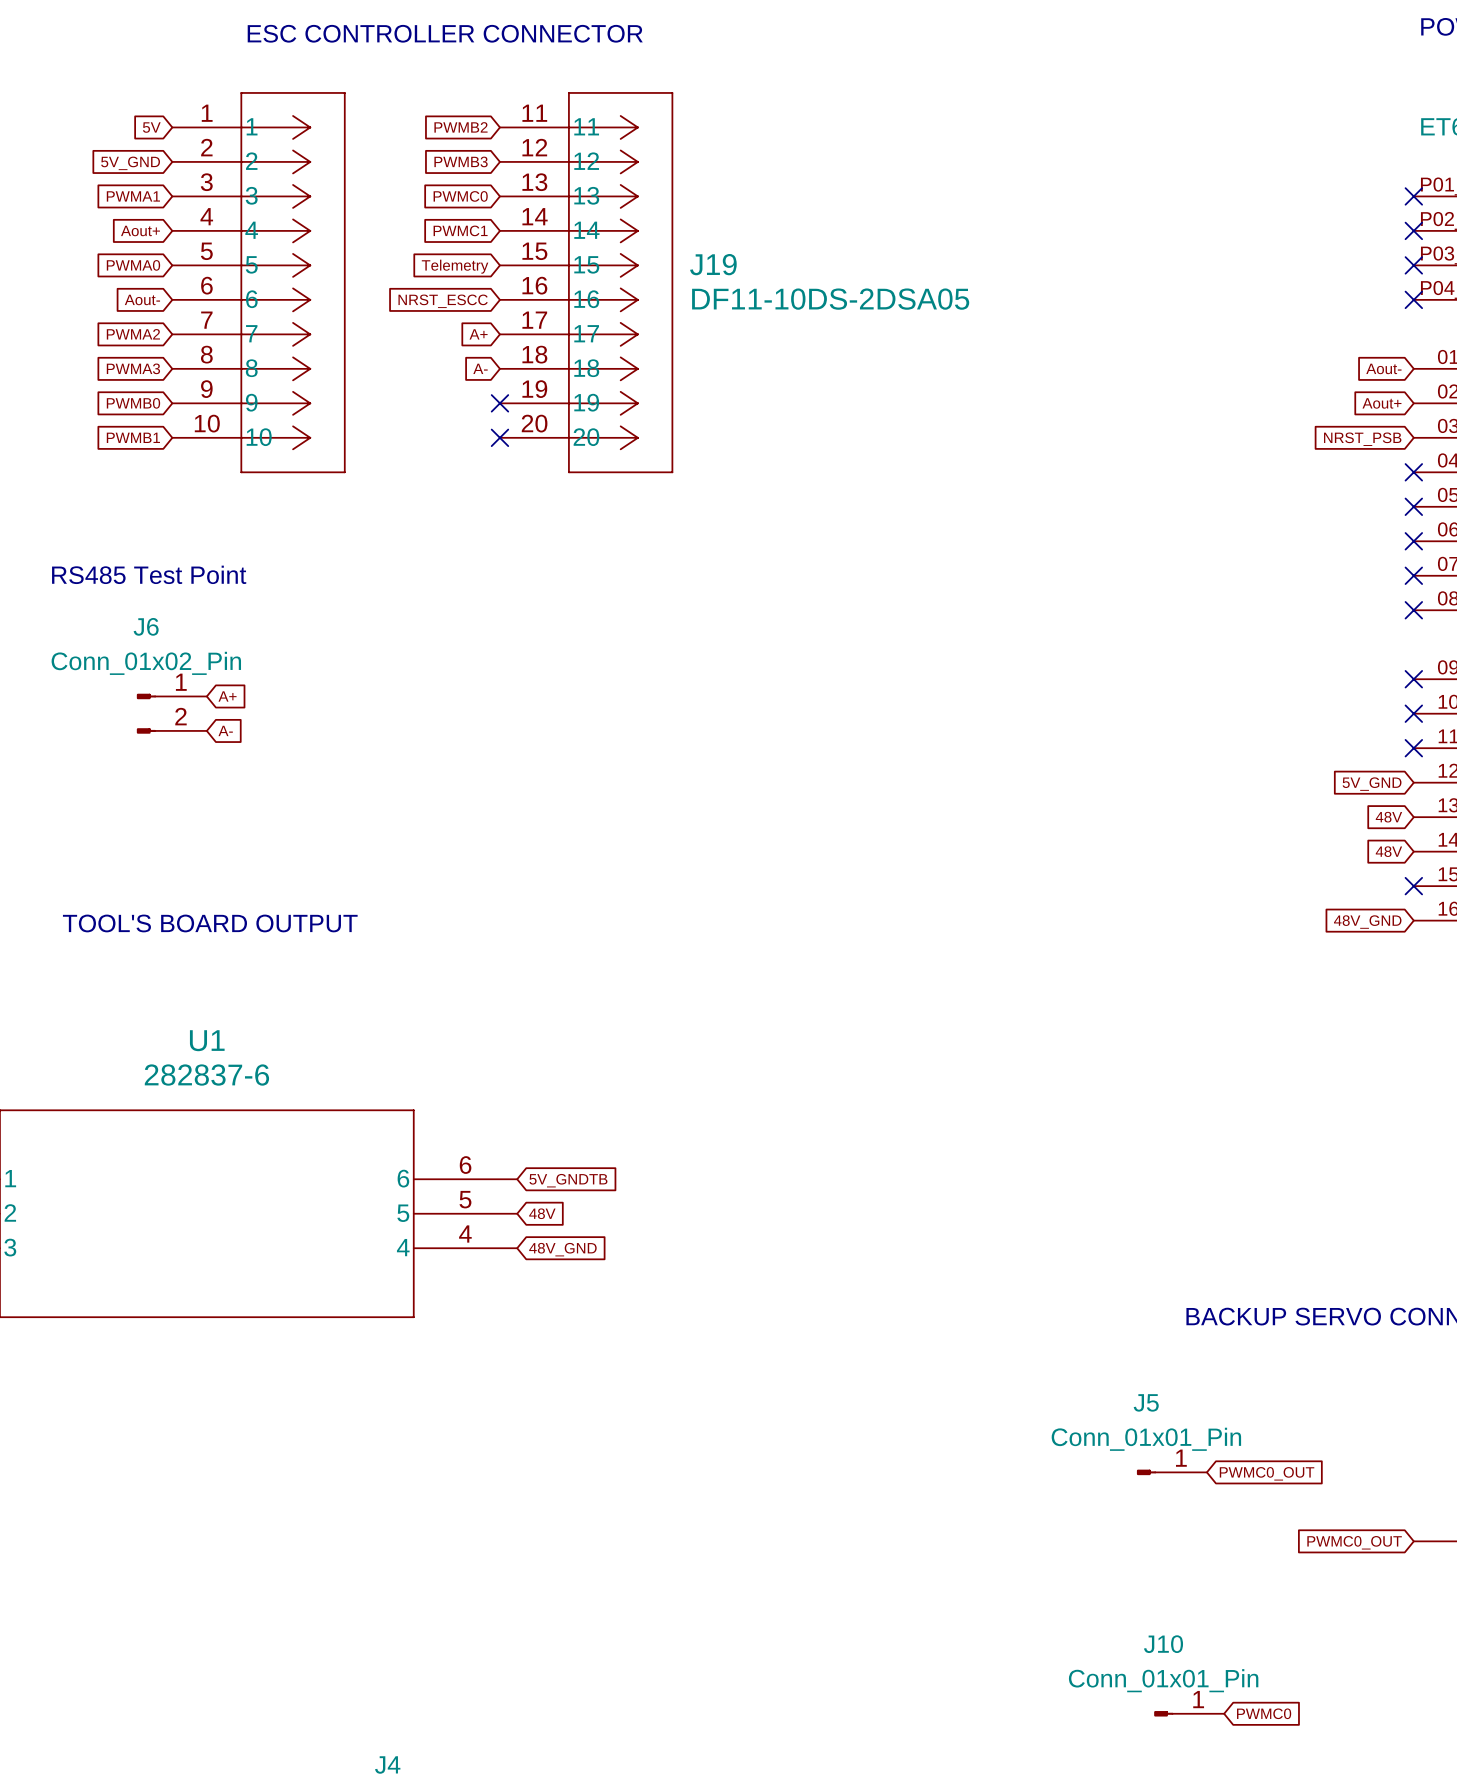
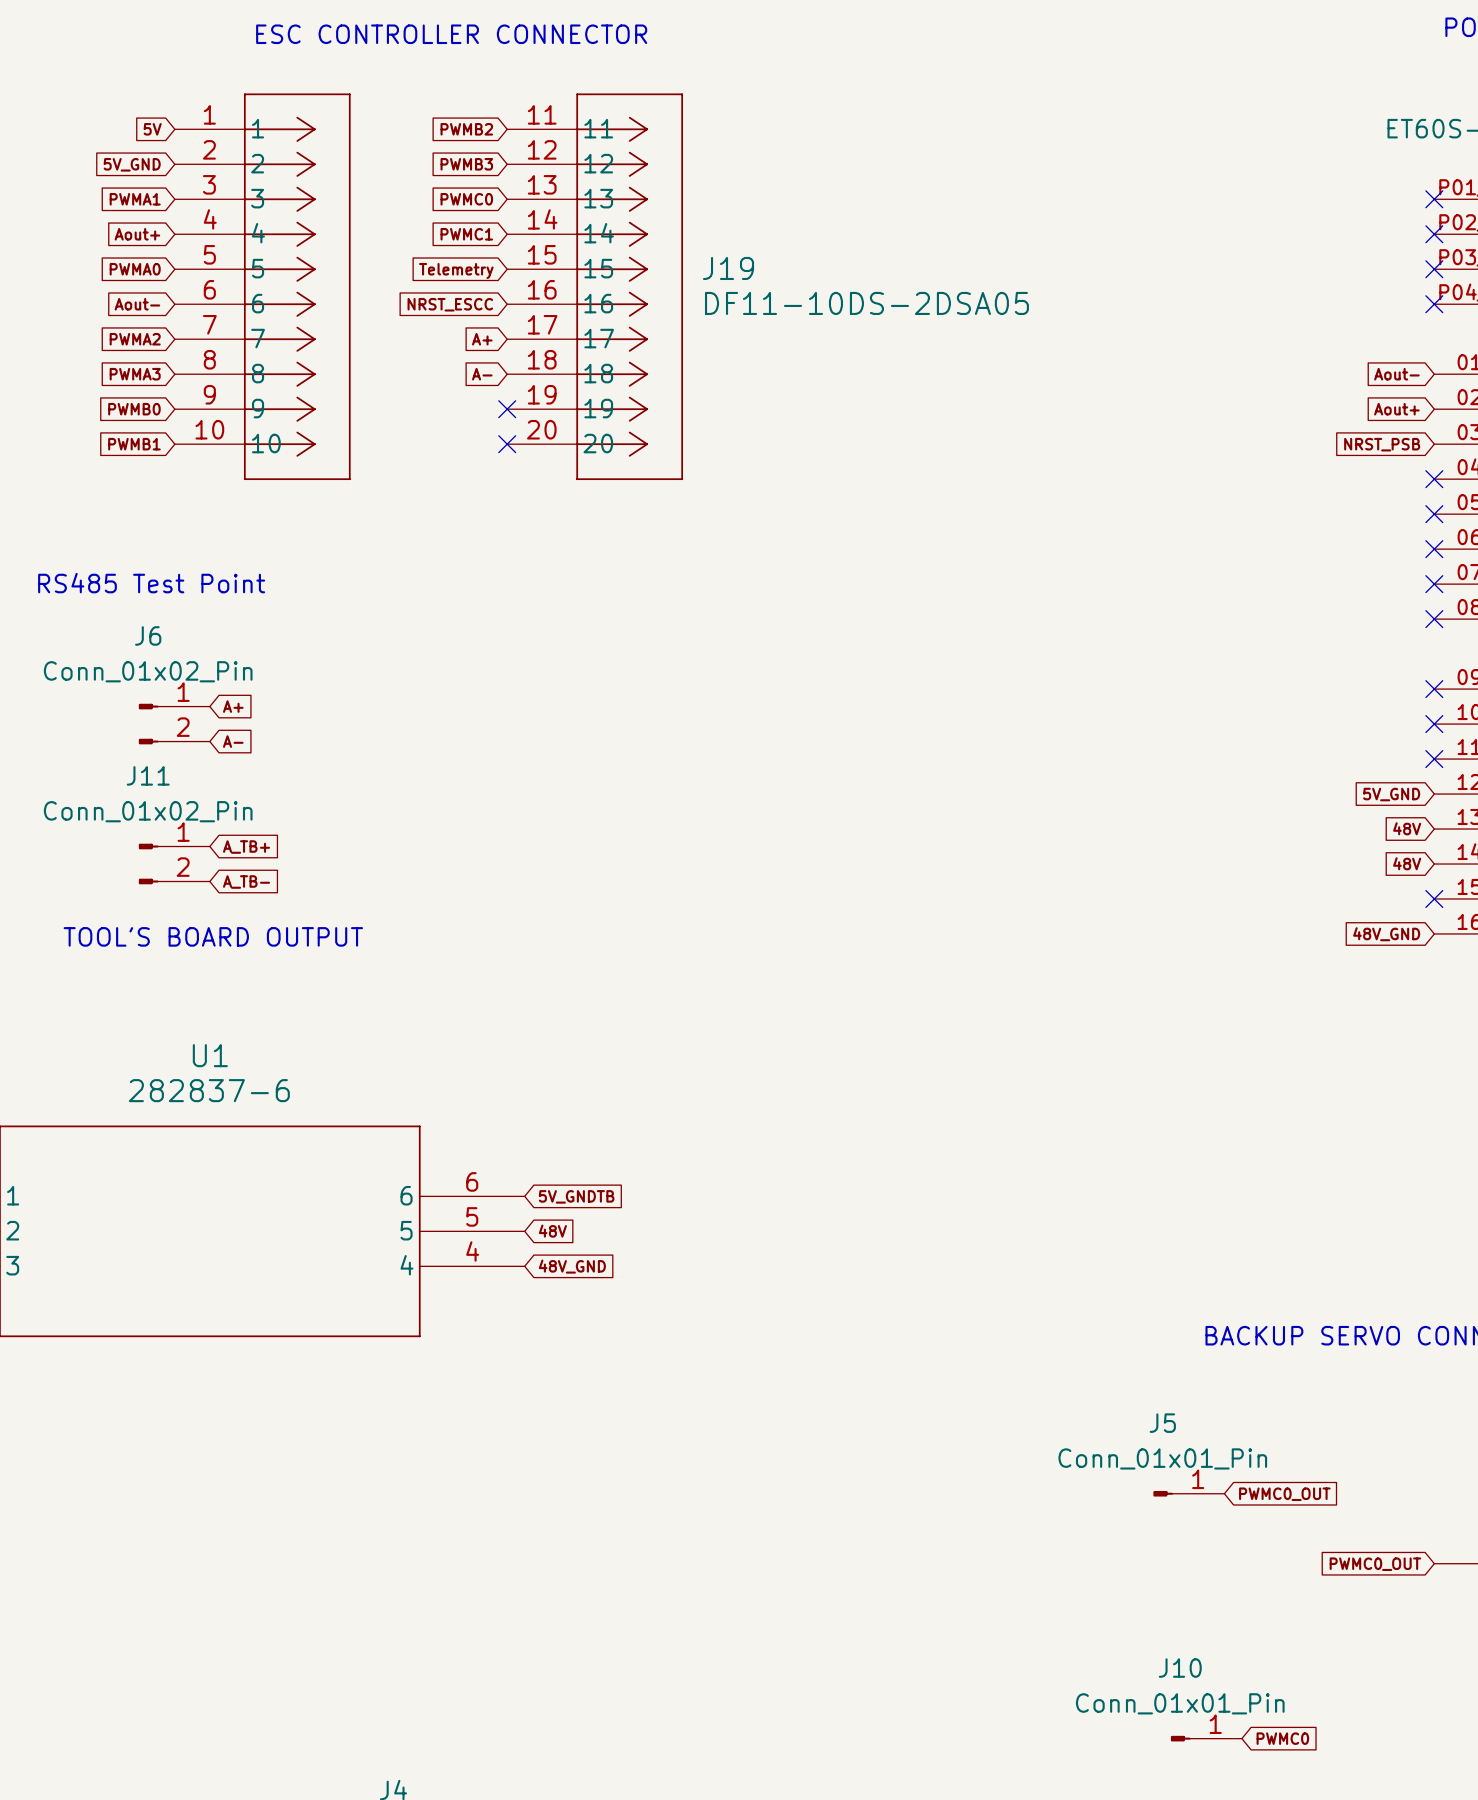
global label: none -> A_TB+ (246, 847)
J11: none -> Conn_01x02_Pin (174, 864)
global label: none -> A_TB- (246, 881)

